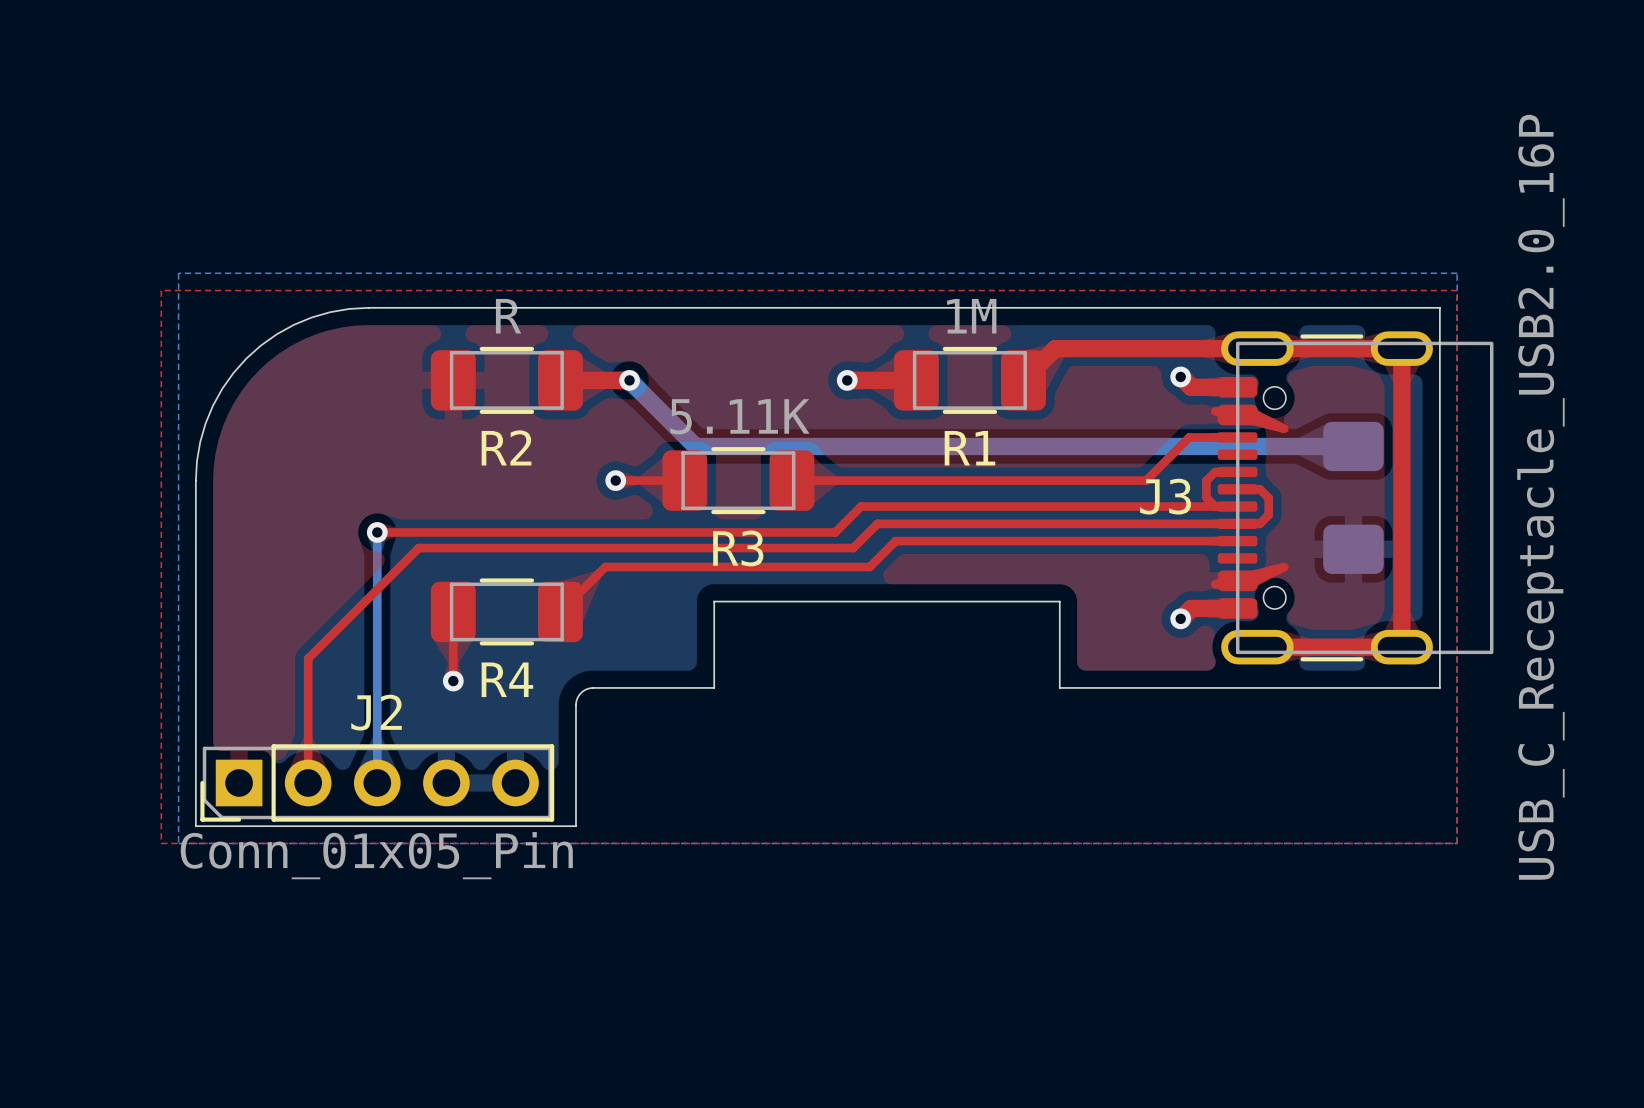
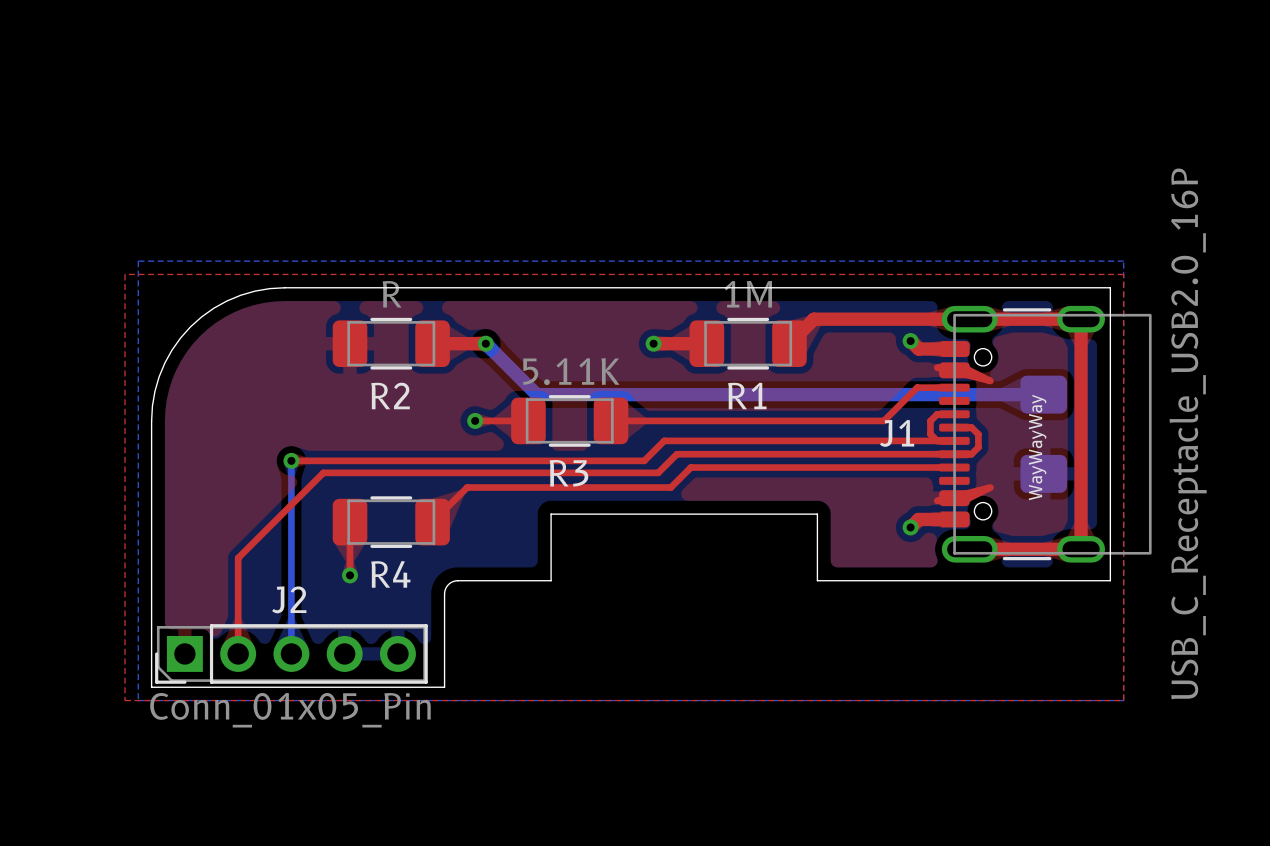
J3 name: J3 (1165, 496) -> J1 (897, 433)
text: none -> WayWayWay (1037, 447)

